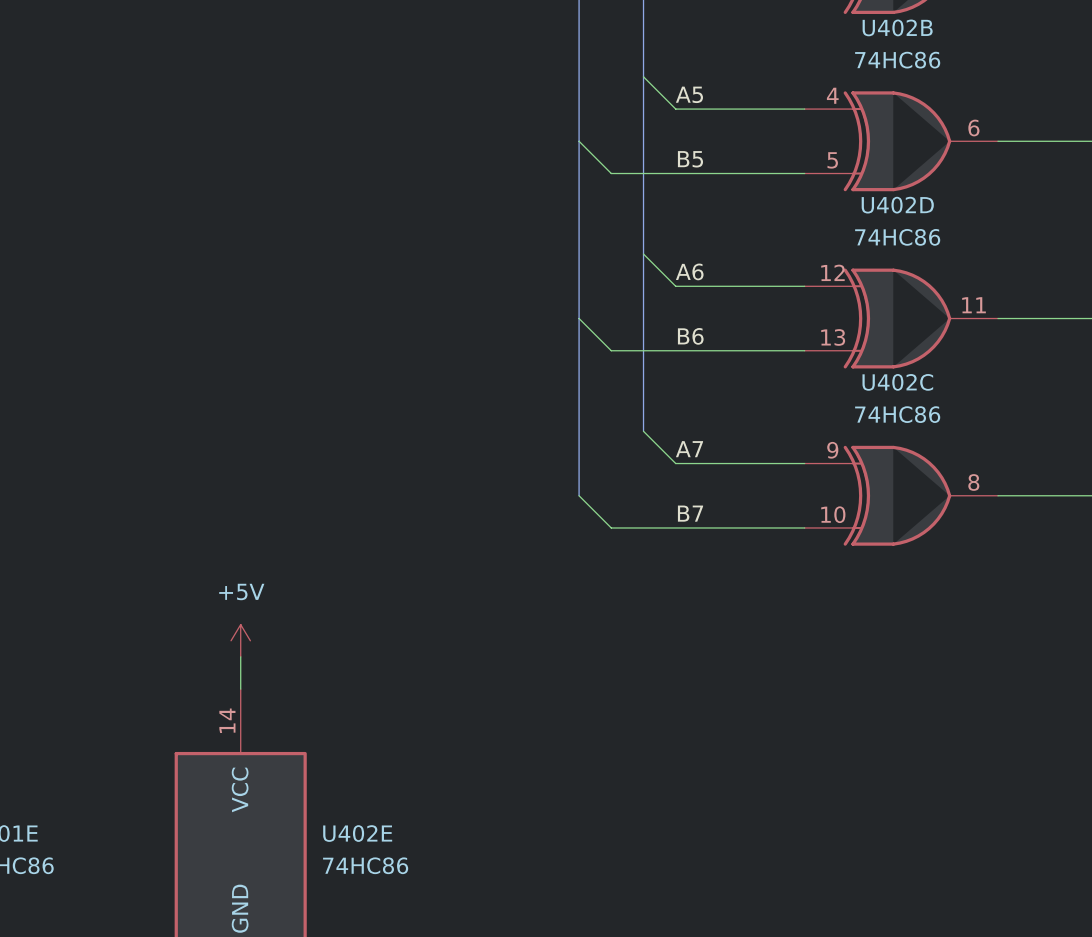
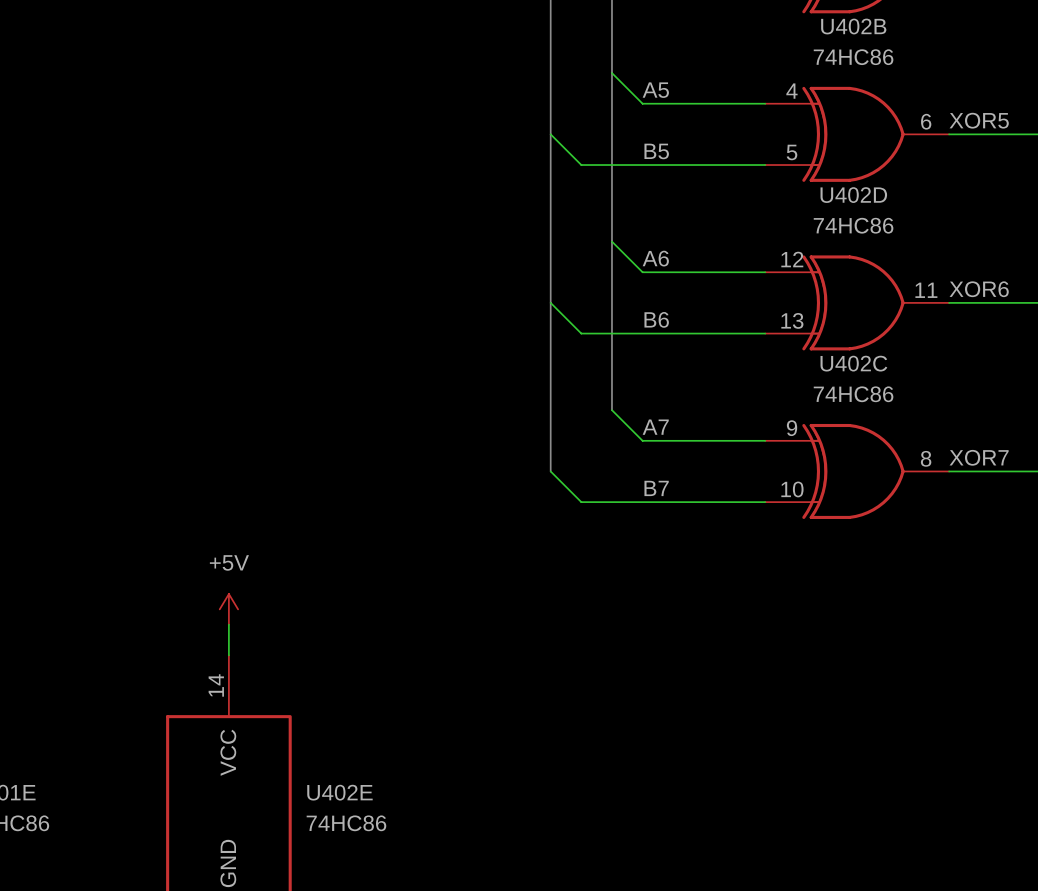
label: none -> XOR5 (979, 120)
label: none -> XOR6 (979, 289)
label: none -> XOR7 (979, 457)

